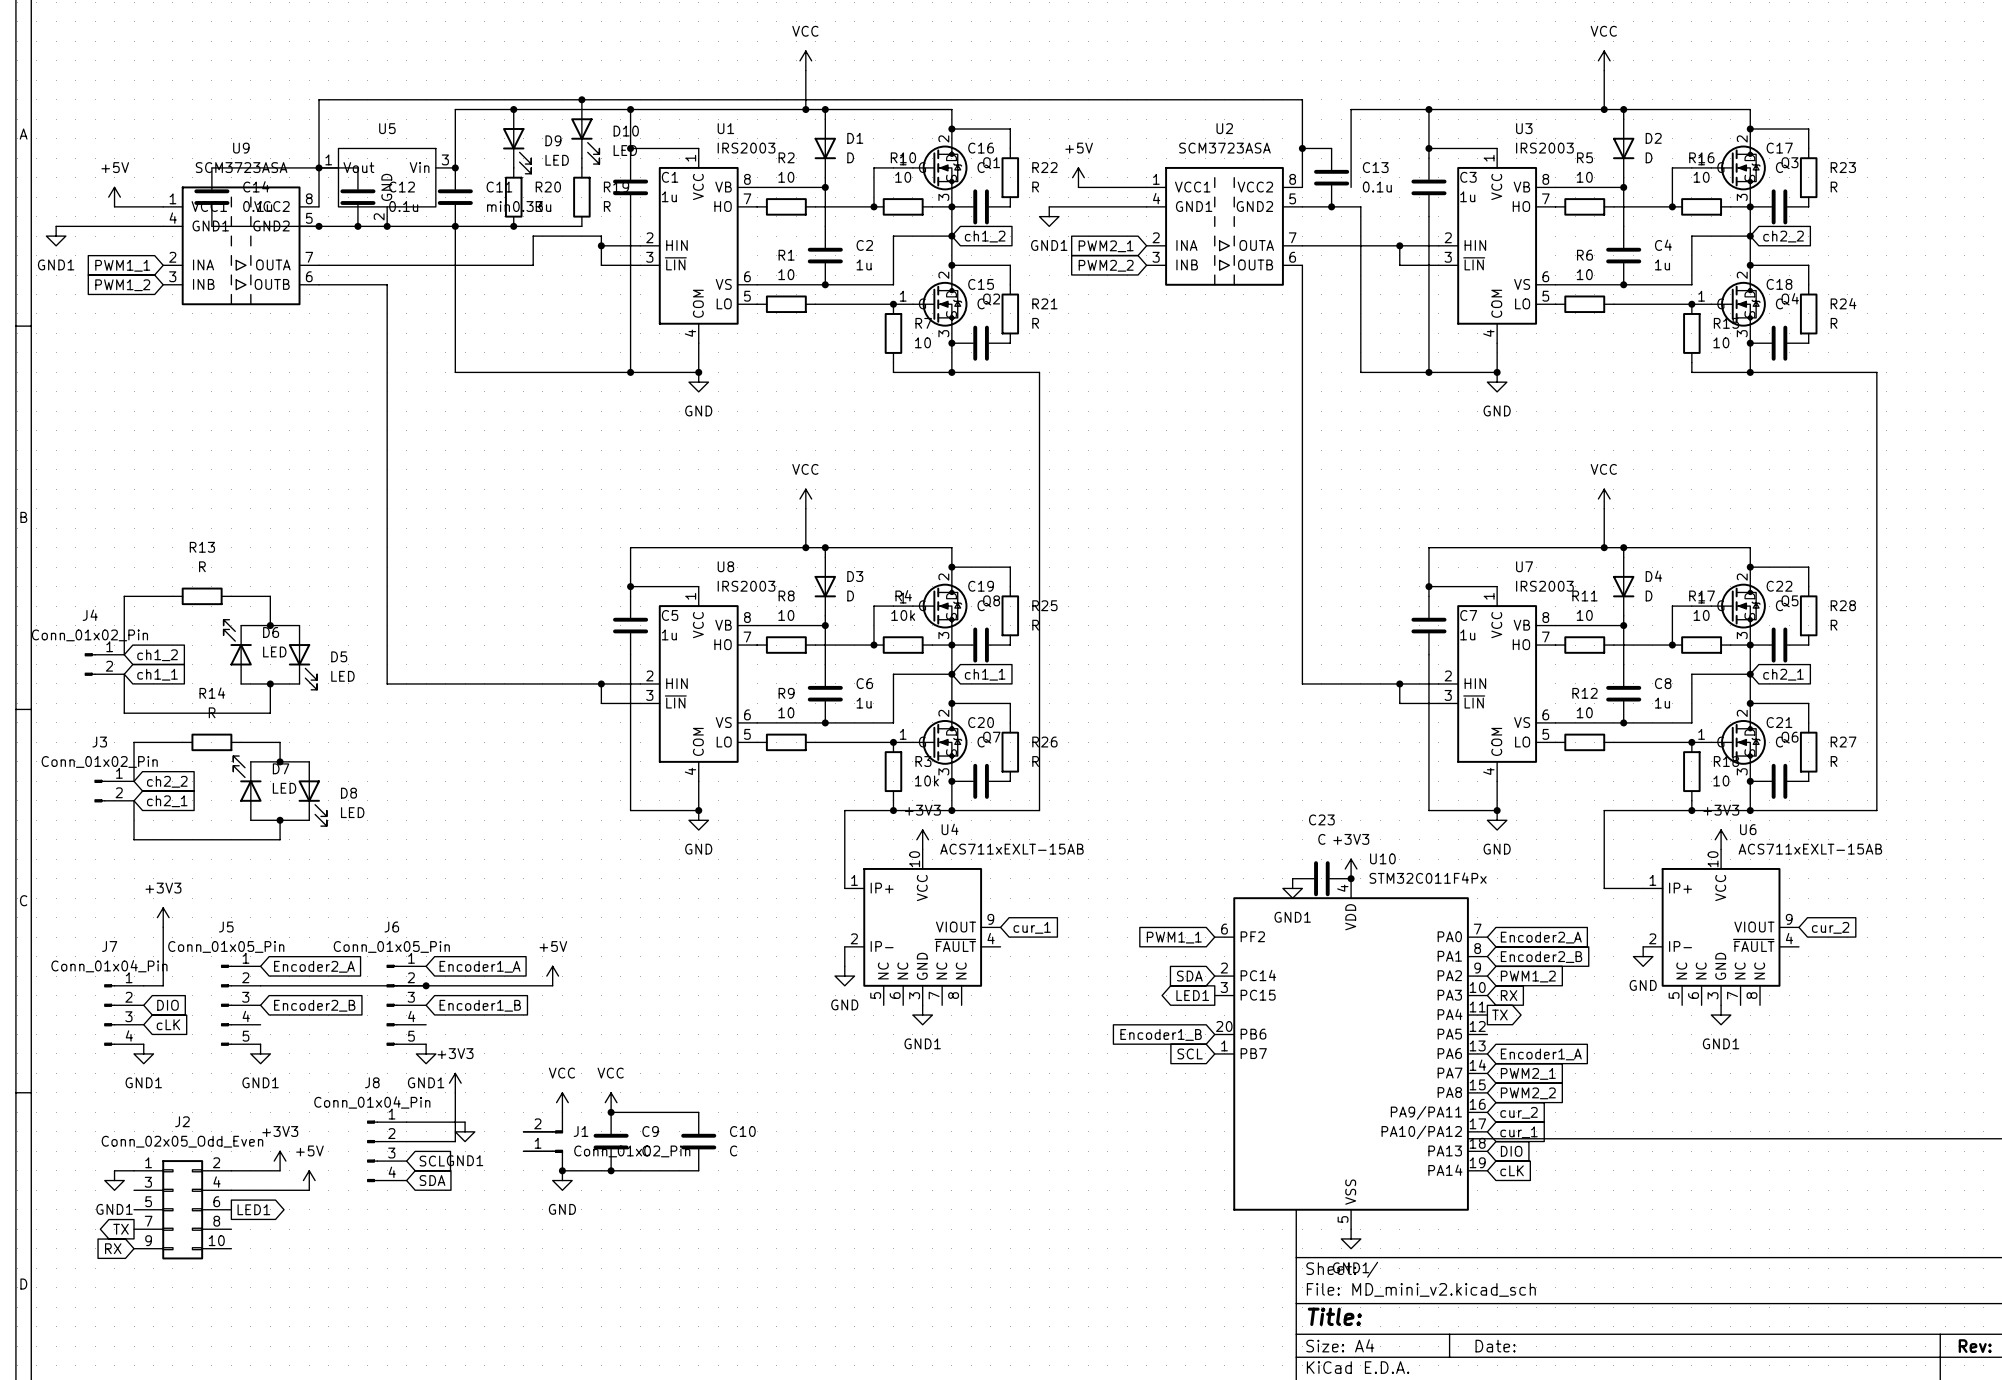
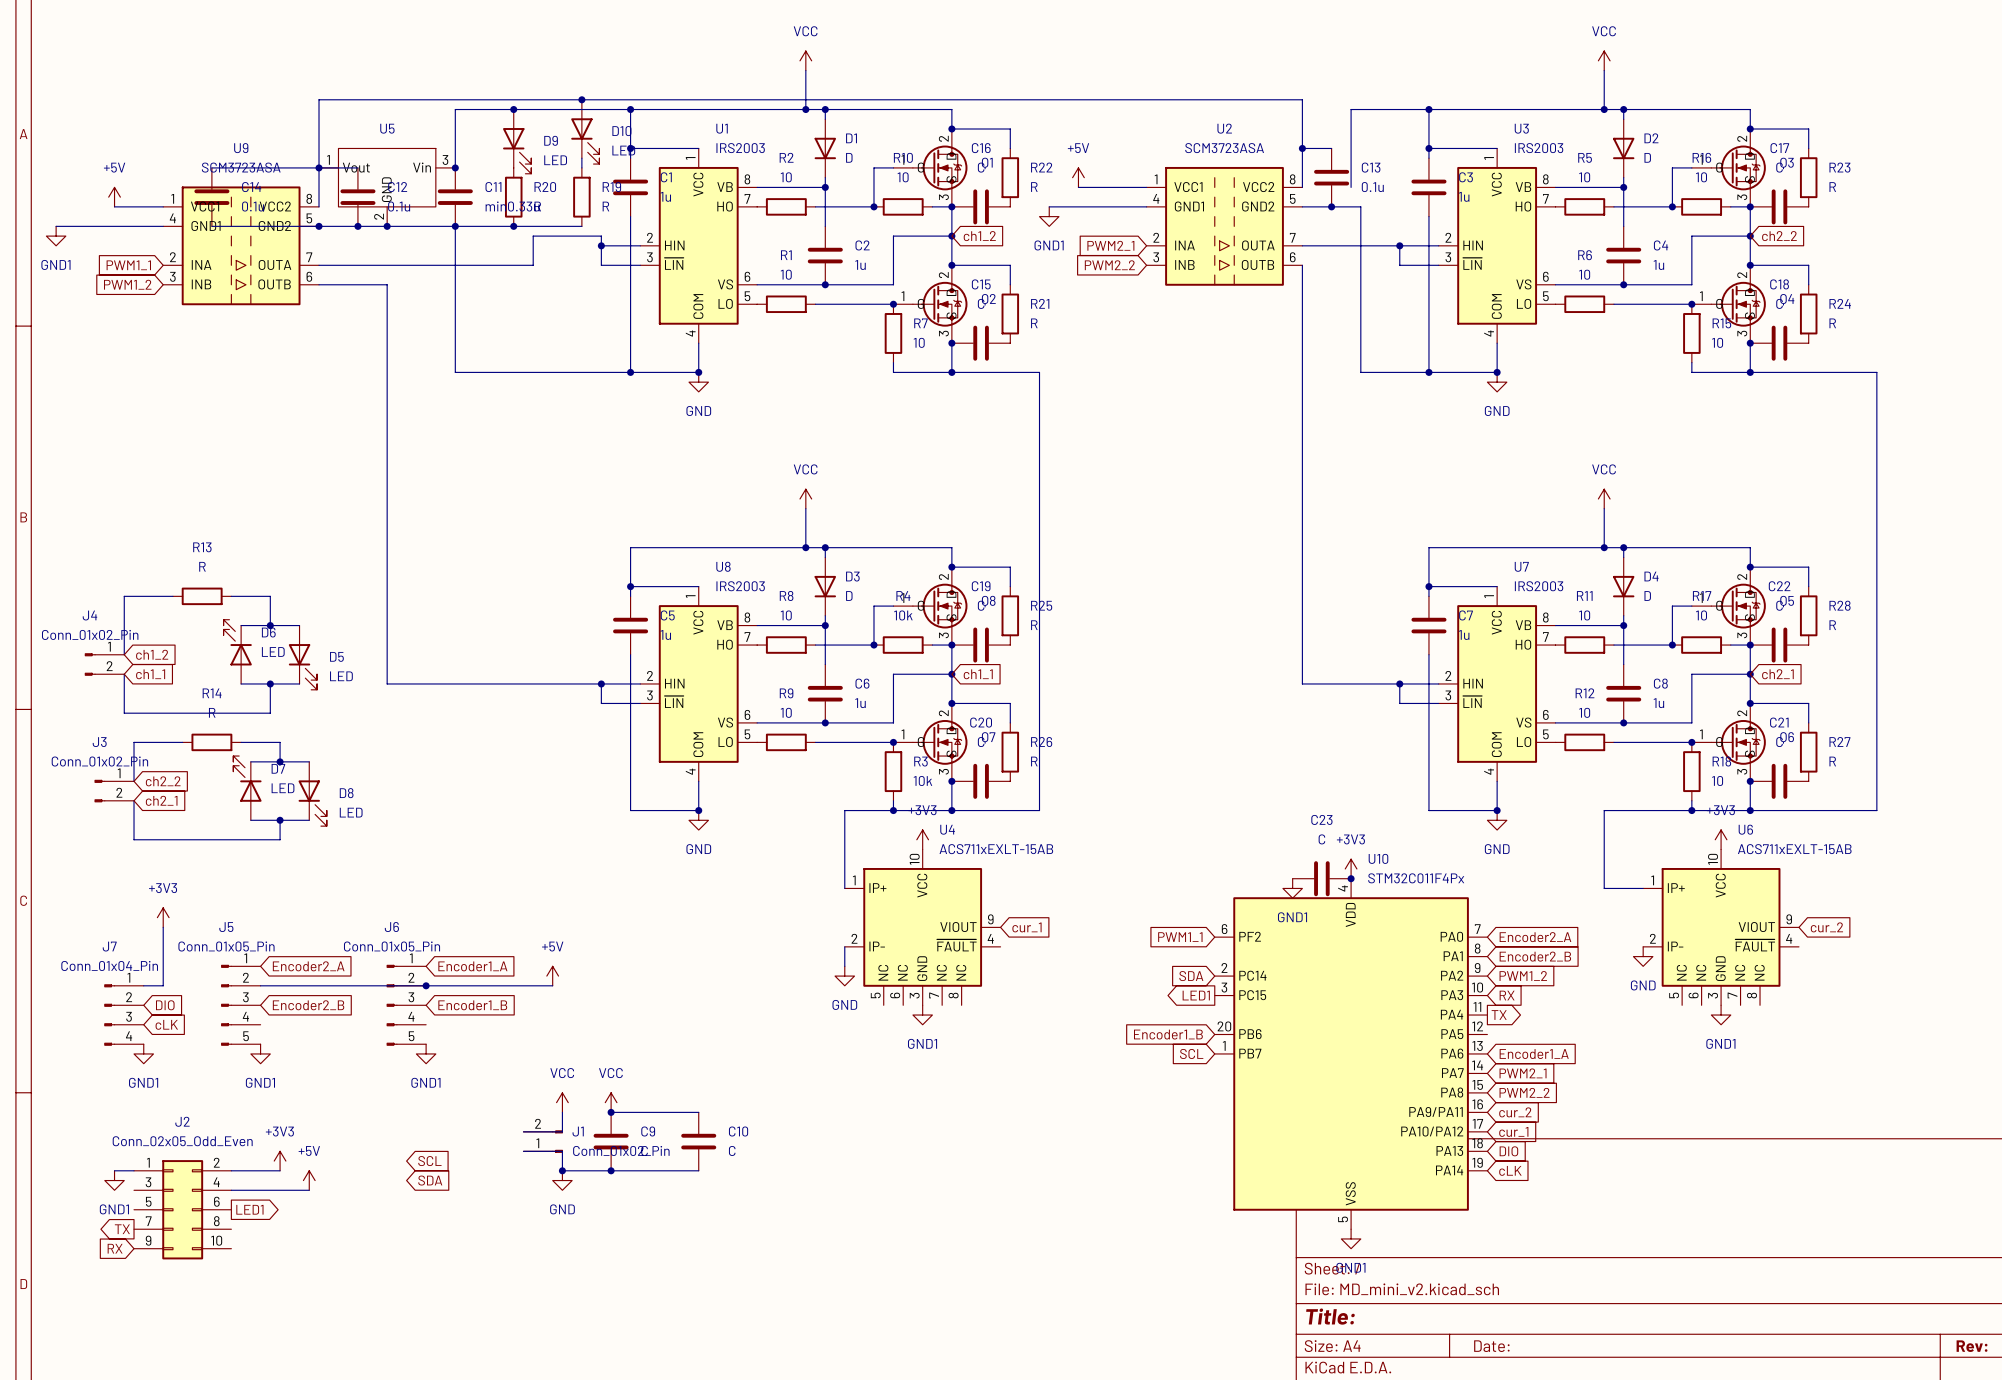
power symbol: +3V3 (455, 1083) -> none
wire: (455, 1092) (455, 1141) (406, 1141) -> none
wire: (406, 1122) (465, 1122) -> none
power symbol: GND1 (465, 1131) -> none
J8: Conn_01x04_Pin (386, 1151) -> none

